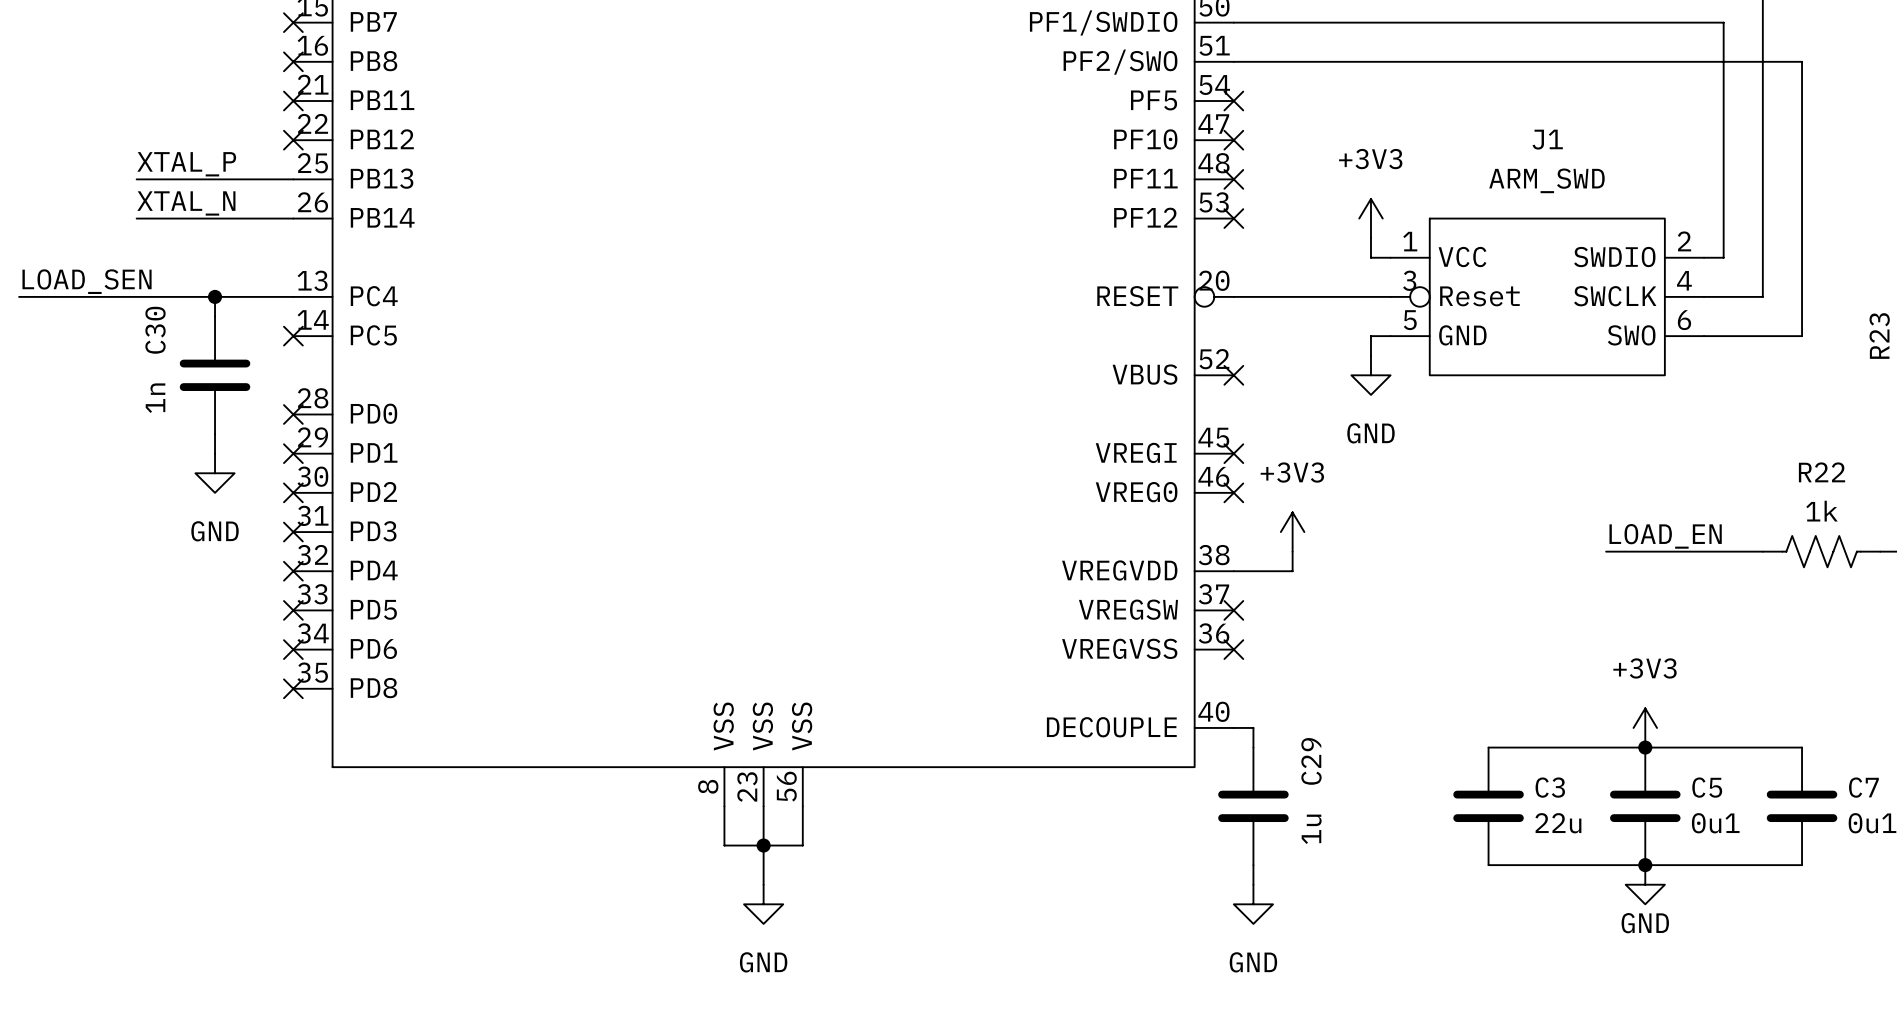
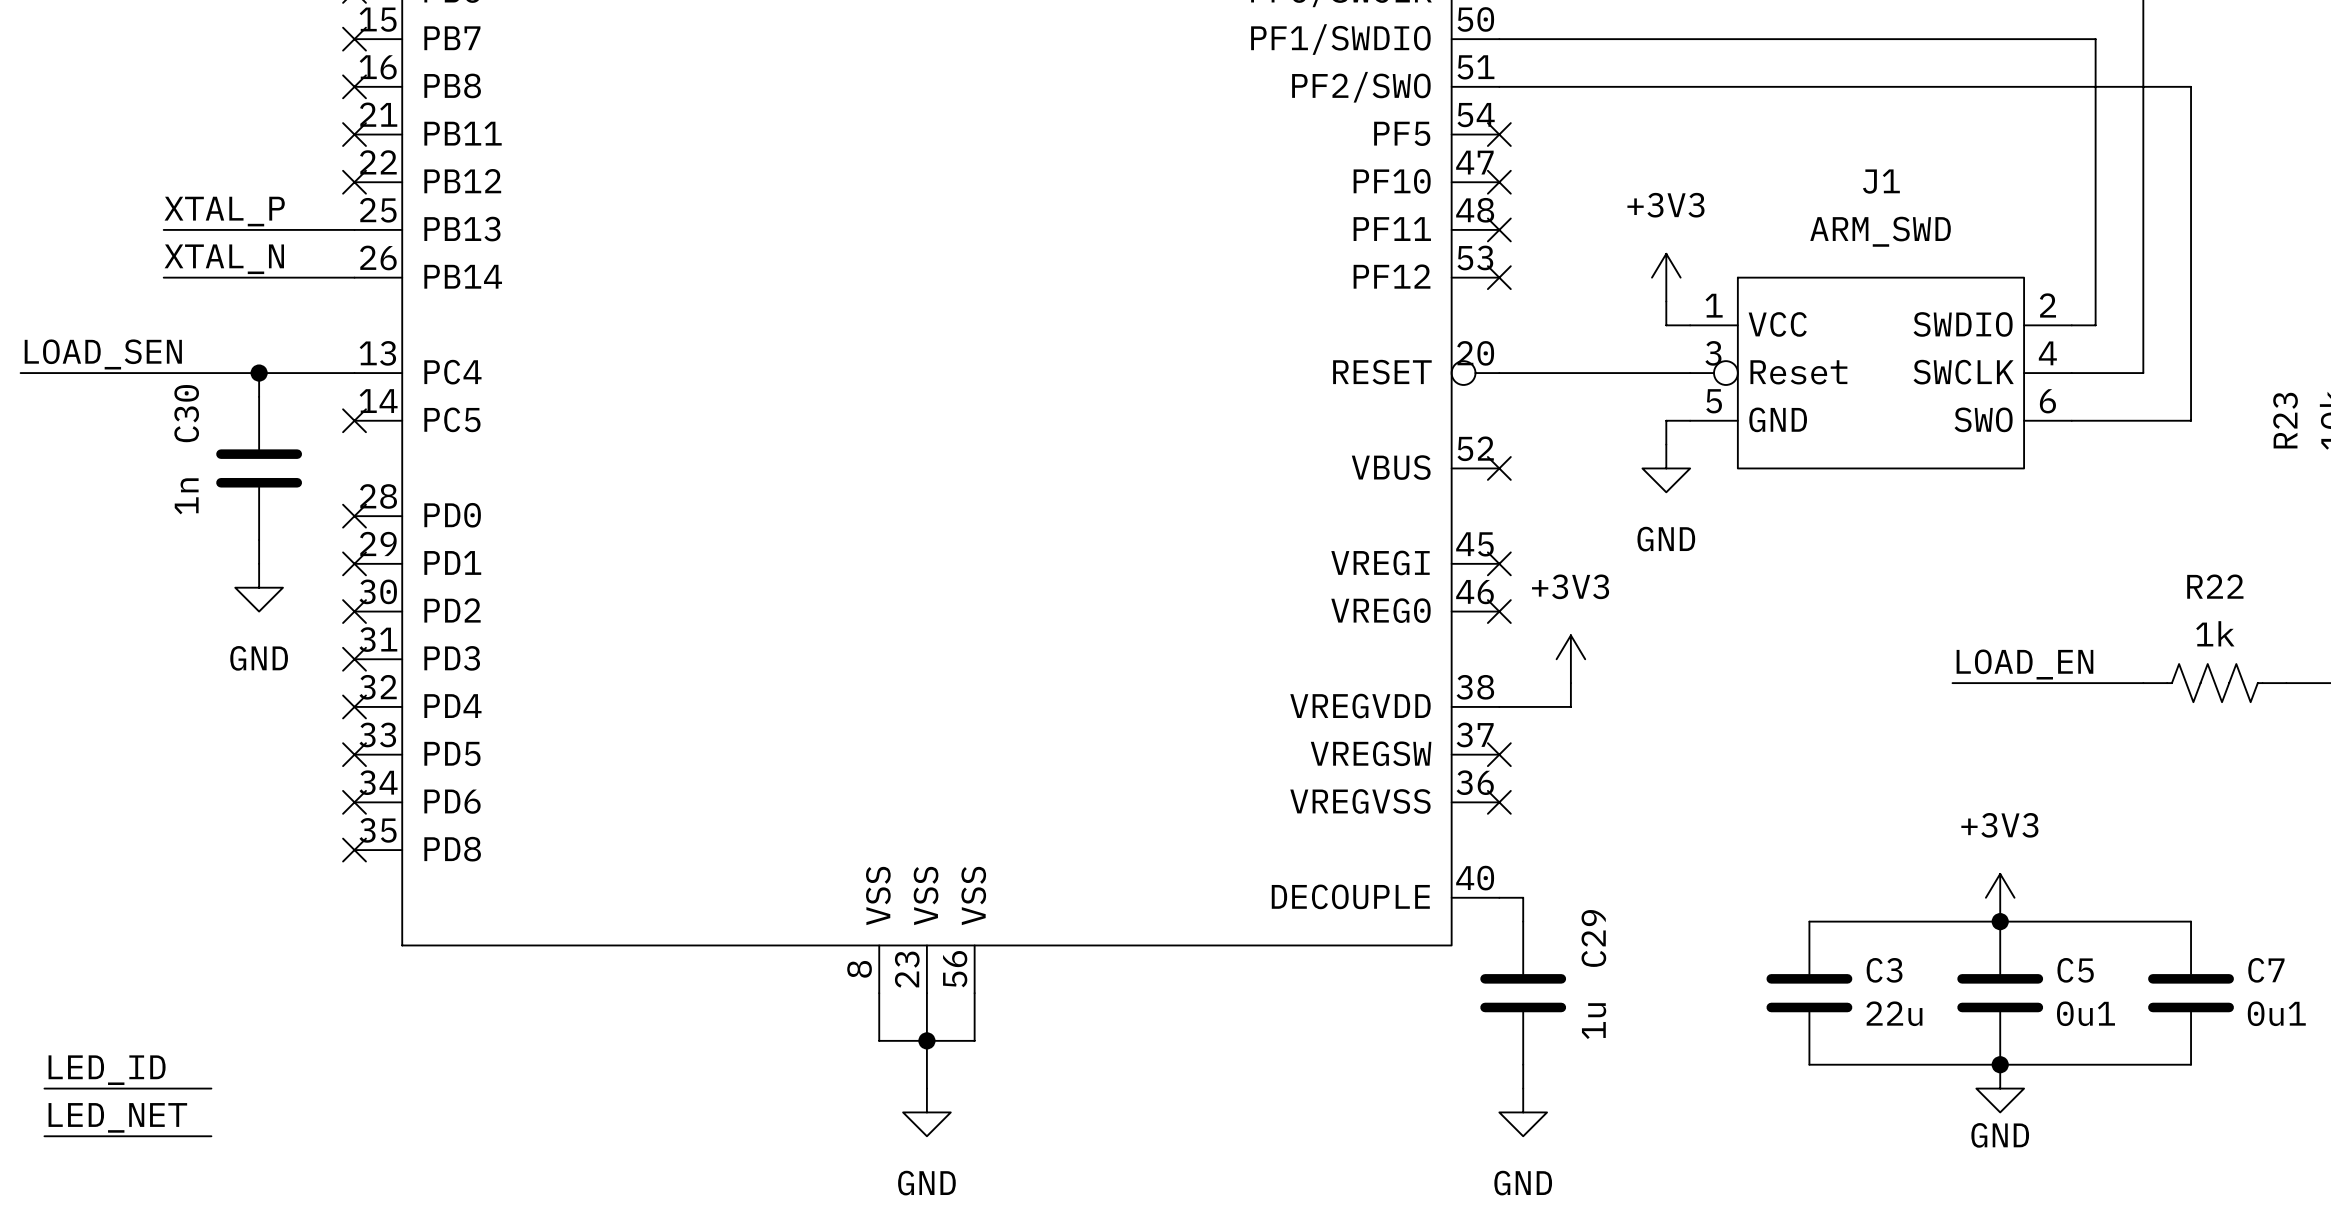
label: none -> LED_ID (107, 1070)
wire: none -> (44, 1088) (211, 1088)
label: none -> LED_NET (117, 1117)
wire: none -> (44, 1136) (211, 1136)

